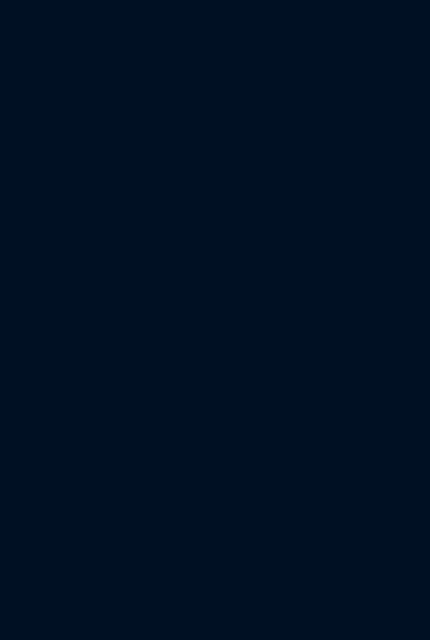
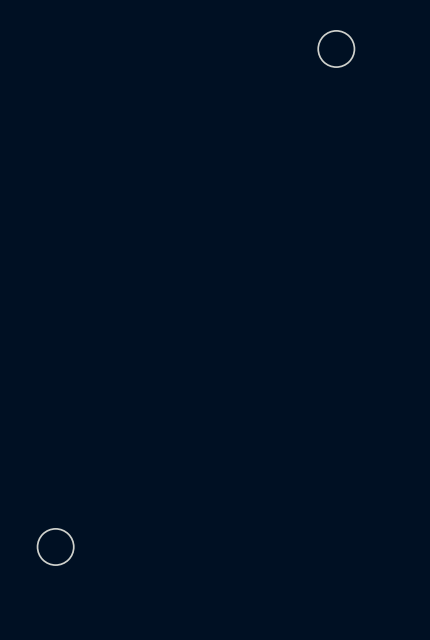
round board edge: none -> [317, 30, 355, 68]
round board edge: none -> [37, 528, 75, 566]

